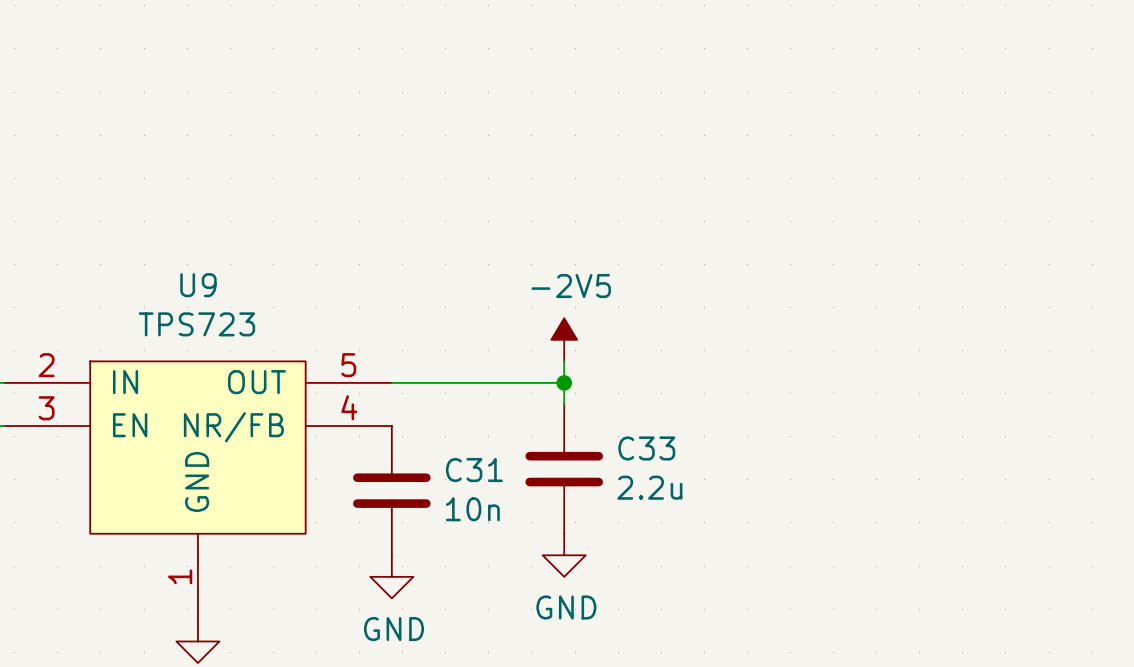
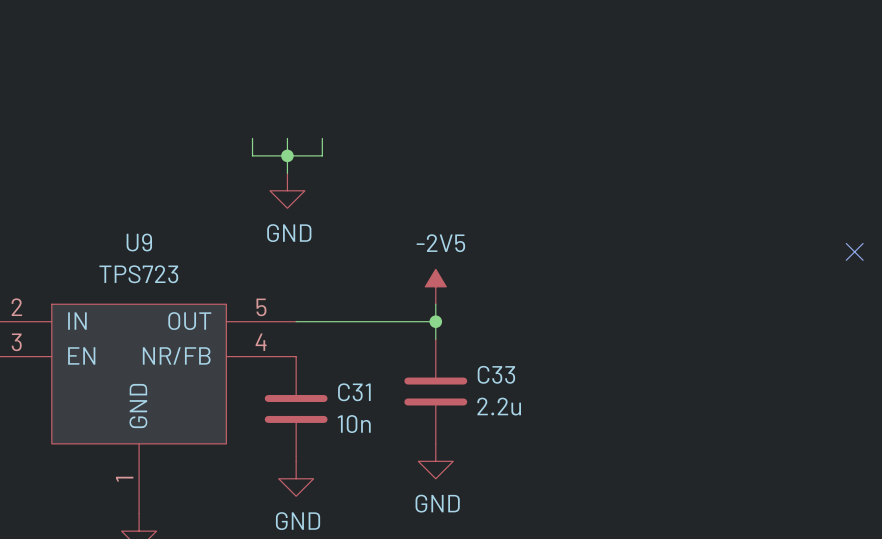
wire: none -> (252, 138) (252, 155) (322, 155) (322, 138)
wire: none -> (287, 138) (287, 173)
junction: none -> (287, 155)
power symbol: none -> GND (287, 190)
no-connect mark: none -> (854, 251)

